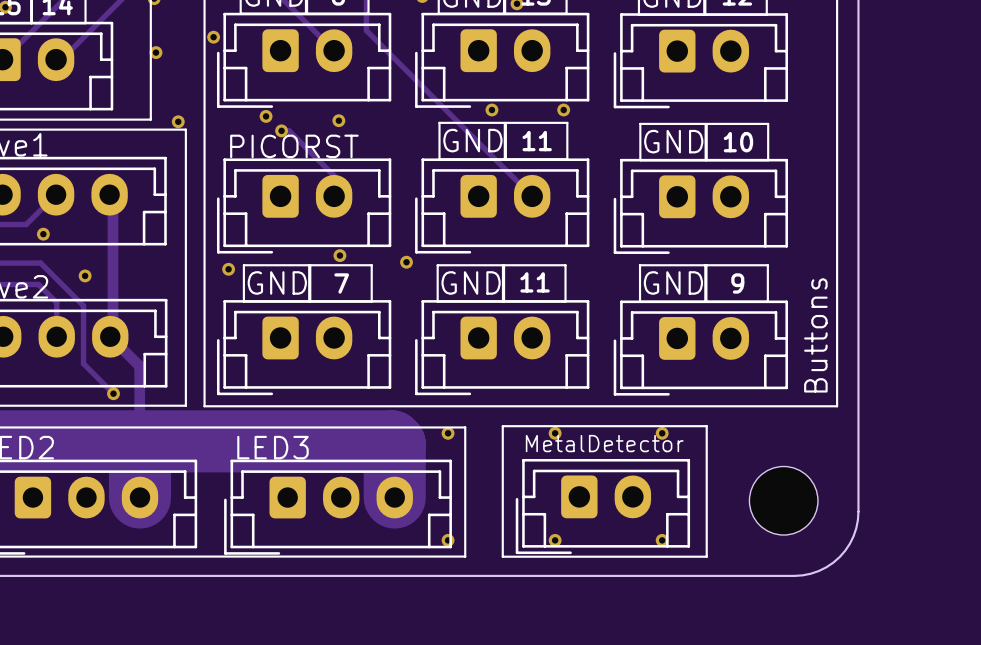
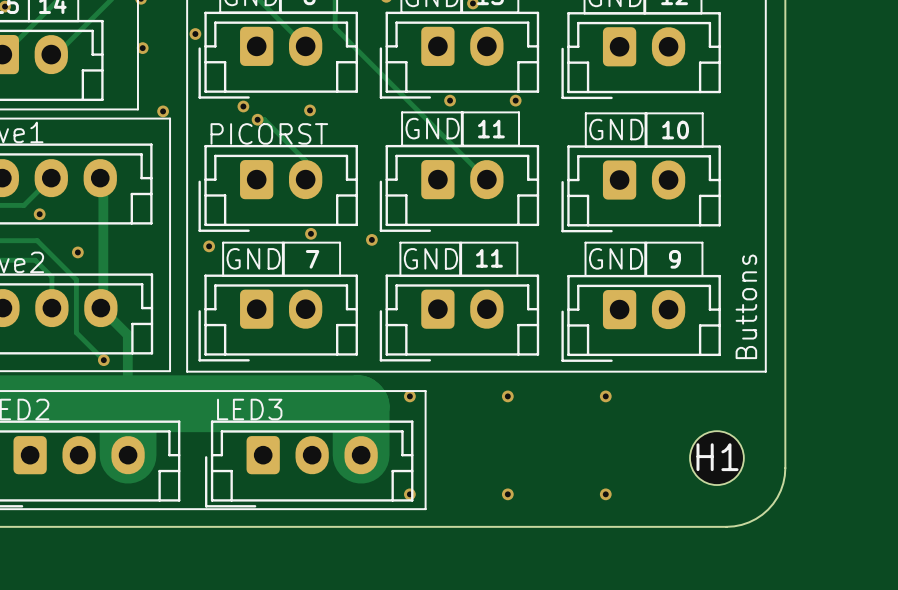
line: (502, 426) (706, 426) (706, 556) (502, 556) (502, 426) -> none
text: MetalDetector (604, 443) -> none
part: (783, 500) -> none
H1: none -> (716, 458)
part: (602, 506) -> none

